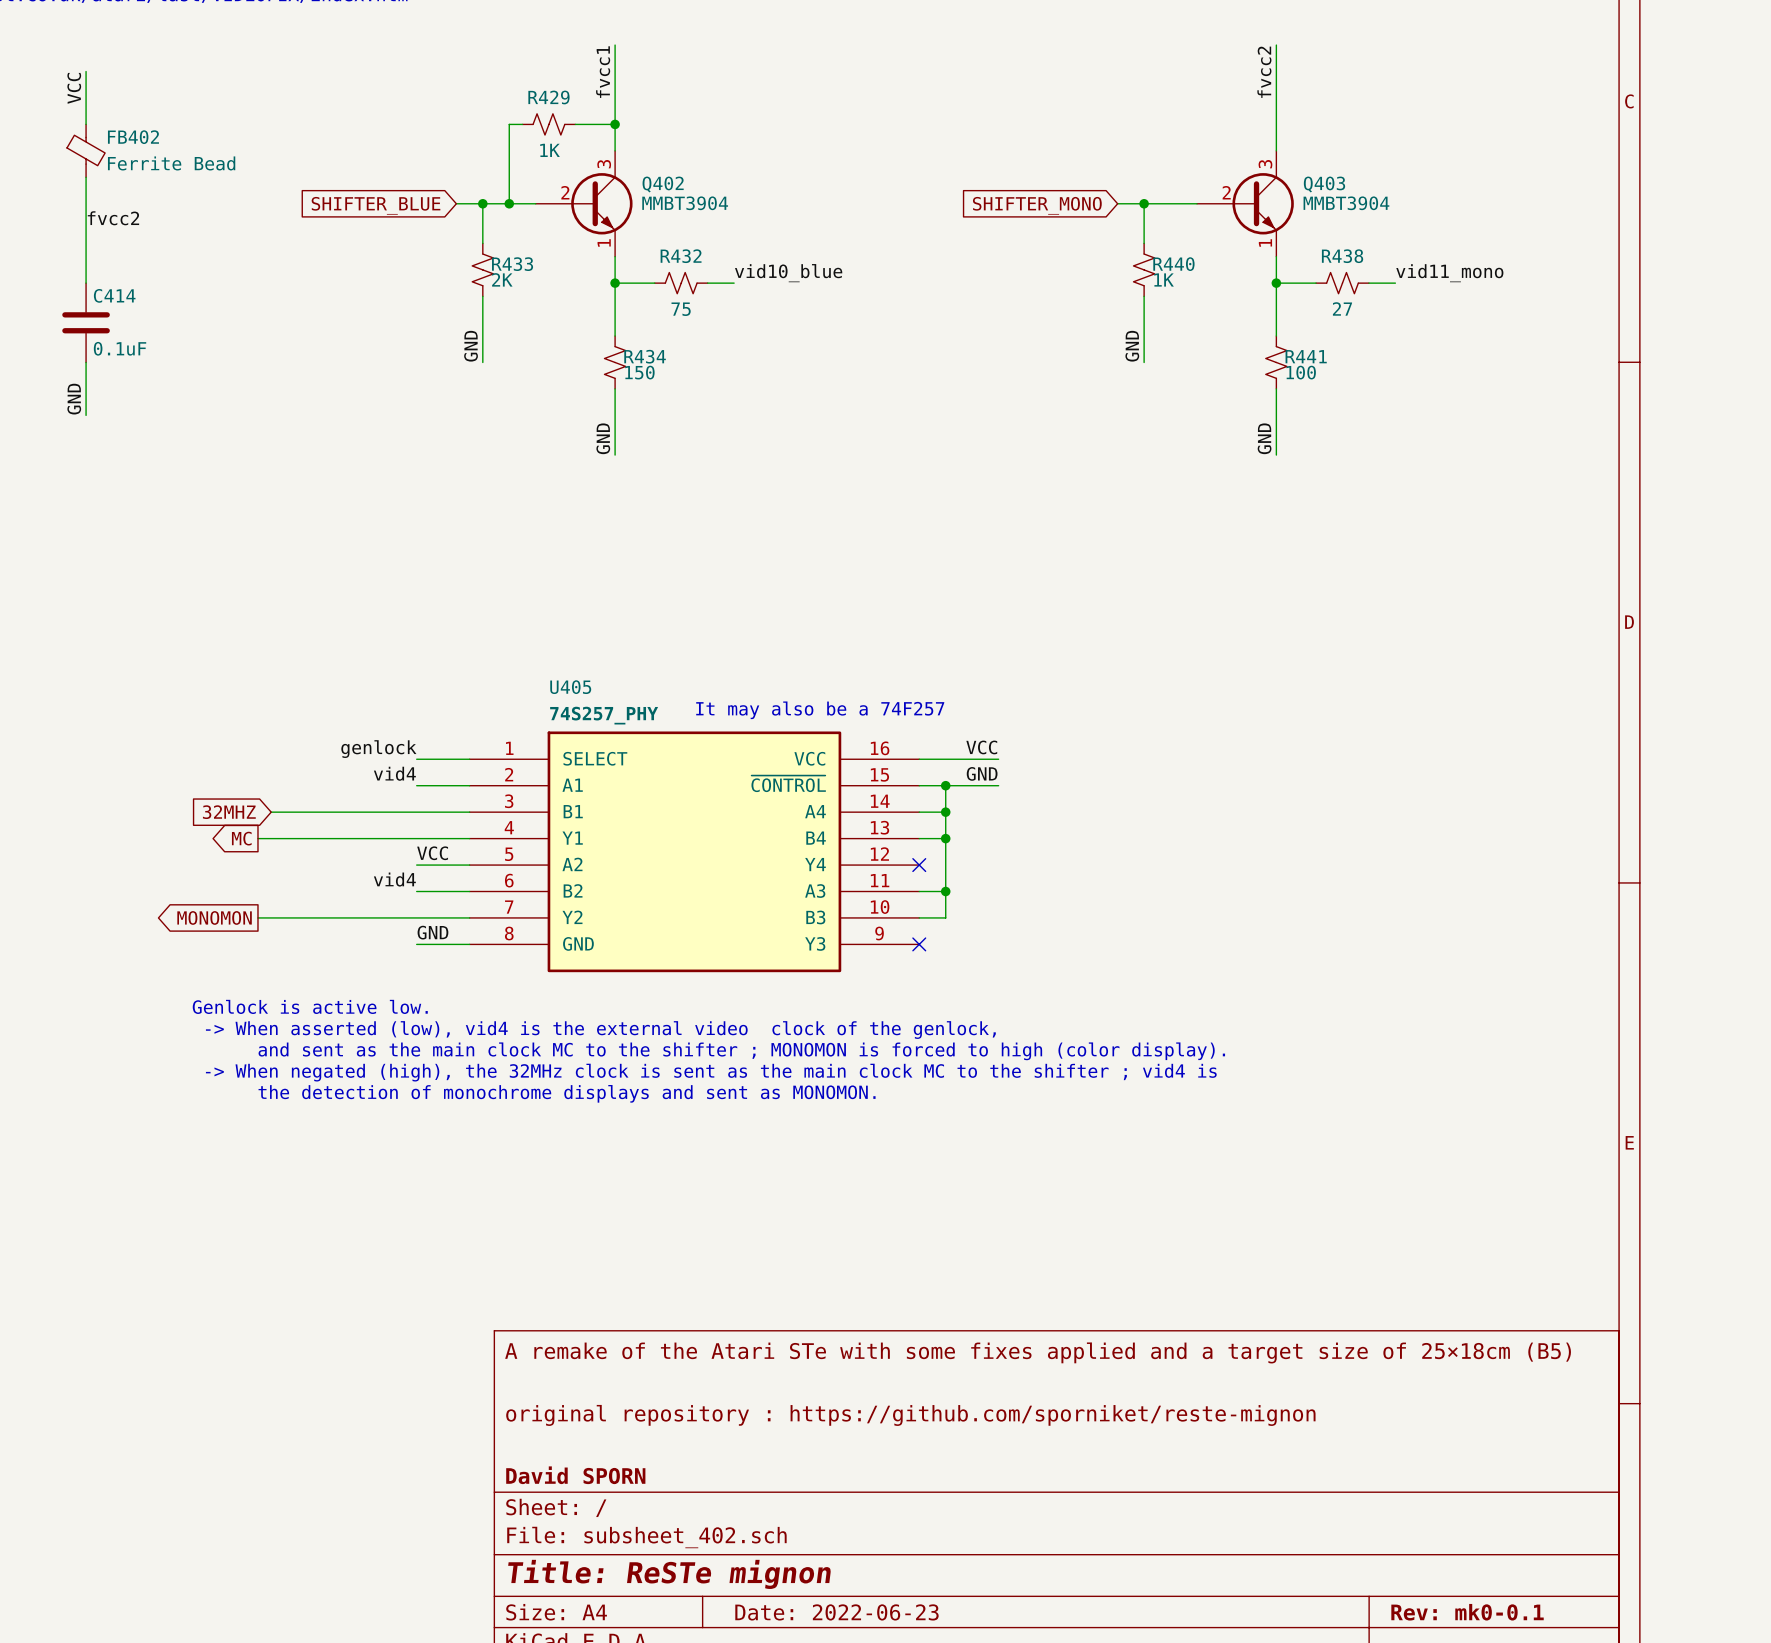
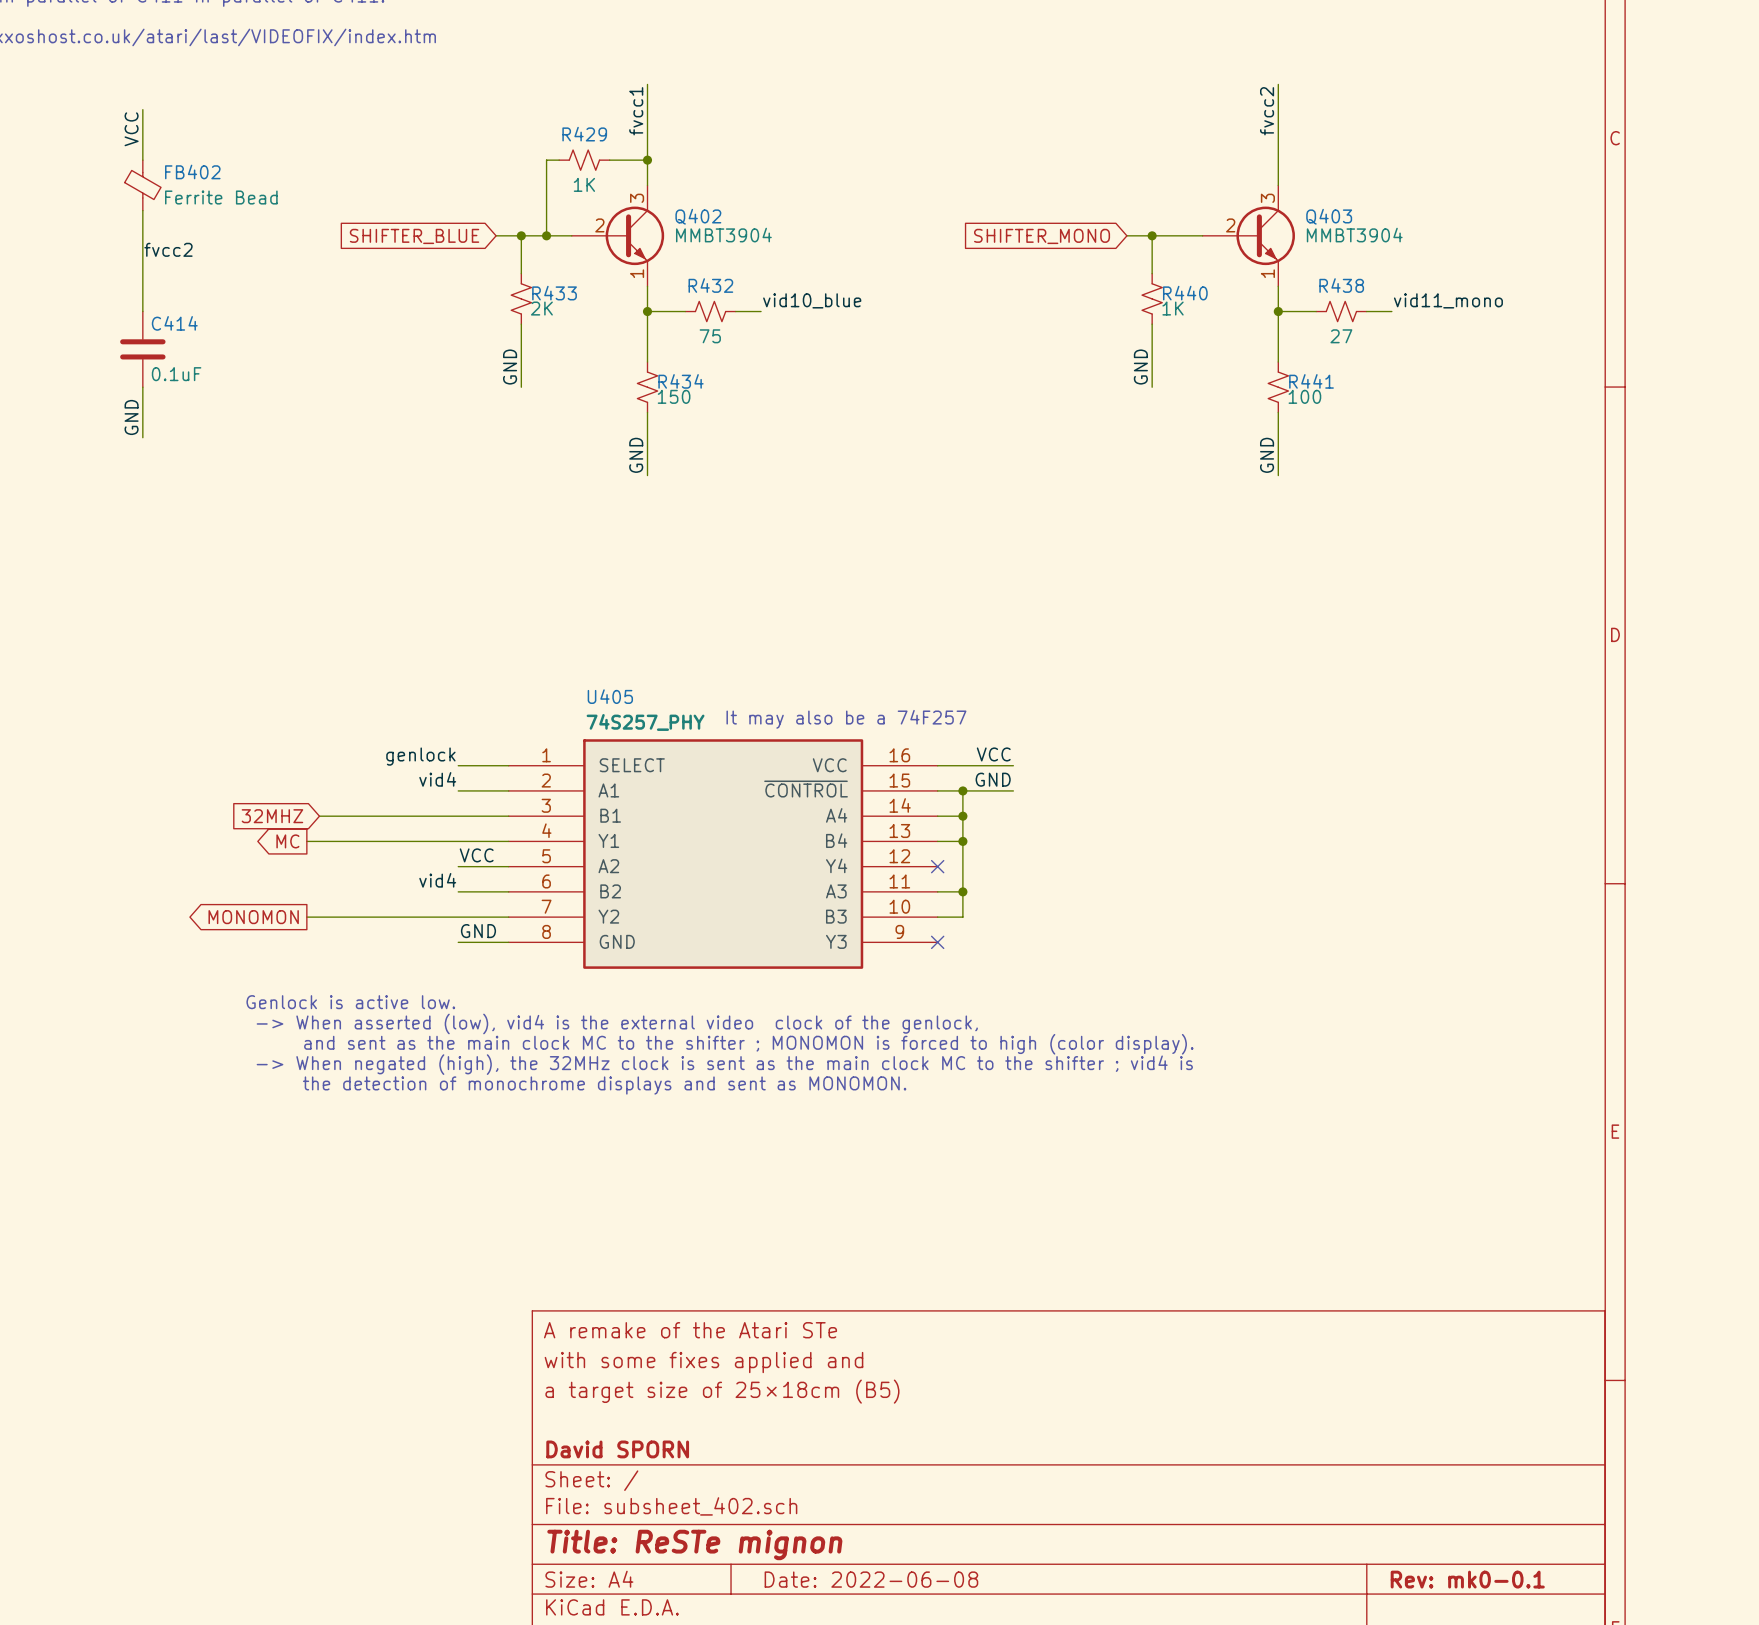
title block: A remake of the Atari STe with some fixes applied and a target size of 25×18cm (B5) (1038, 1352) -> A remake of the Atari STe (690, 1330)
title block: none -> with some fixes applied and (703, 1362)
title block: original repository : https://github.com/sporniket/reste-mignon (910, 1415) -> a target size of 25×18cm (B5) (722, 1391)
title block: Date: 2022-06-23 (836, 1612) -> Date: 2022-06-08 (871, 1579)

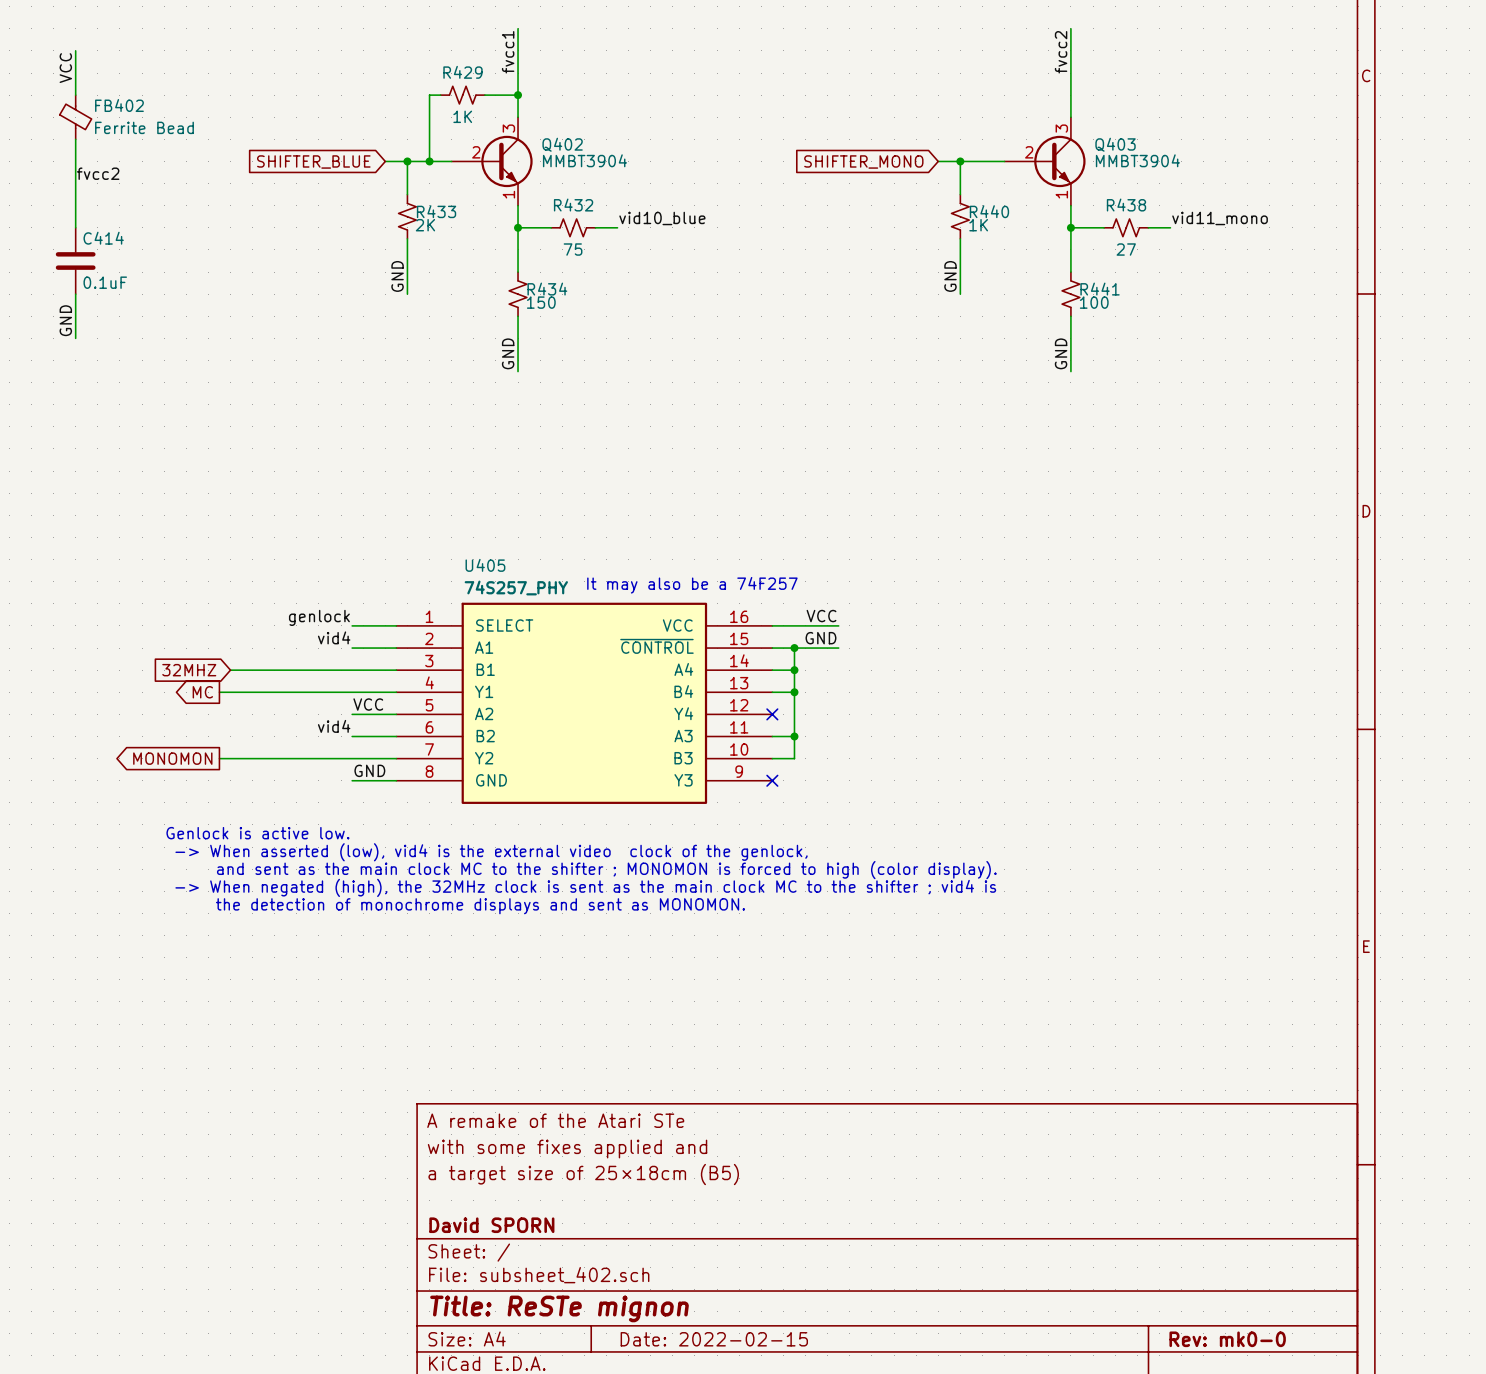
title block: Date: 2022-06-08 (871, 1579) -> Date: 2022-02-15 (714, 1339)
title block: Rev: mk0-0.1 (1467, 1579) -> Rev: mk0-0 (1227, 1339)

